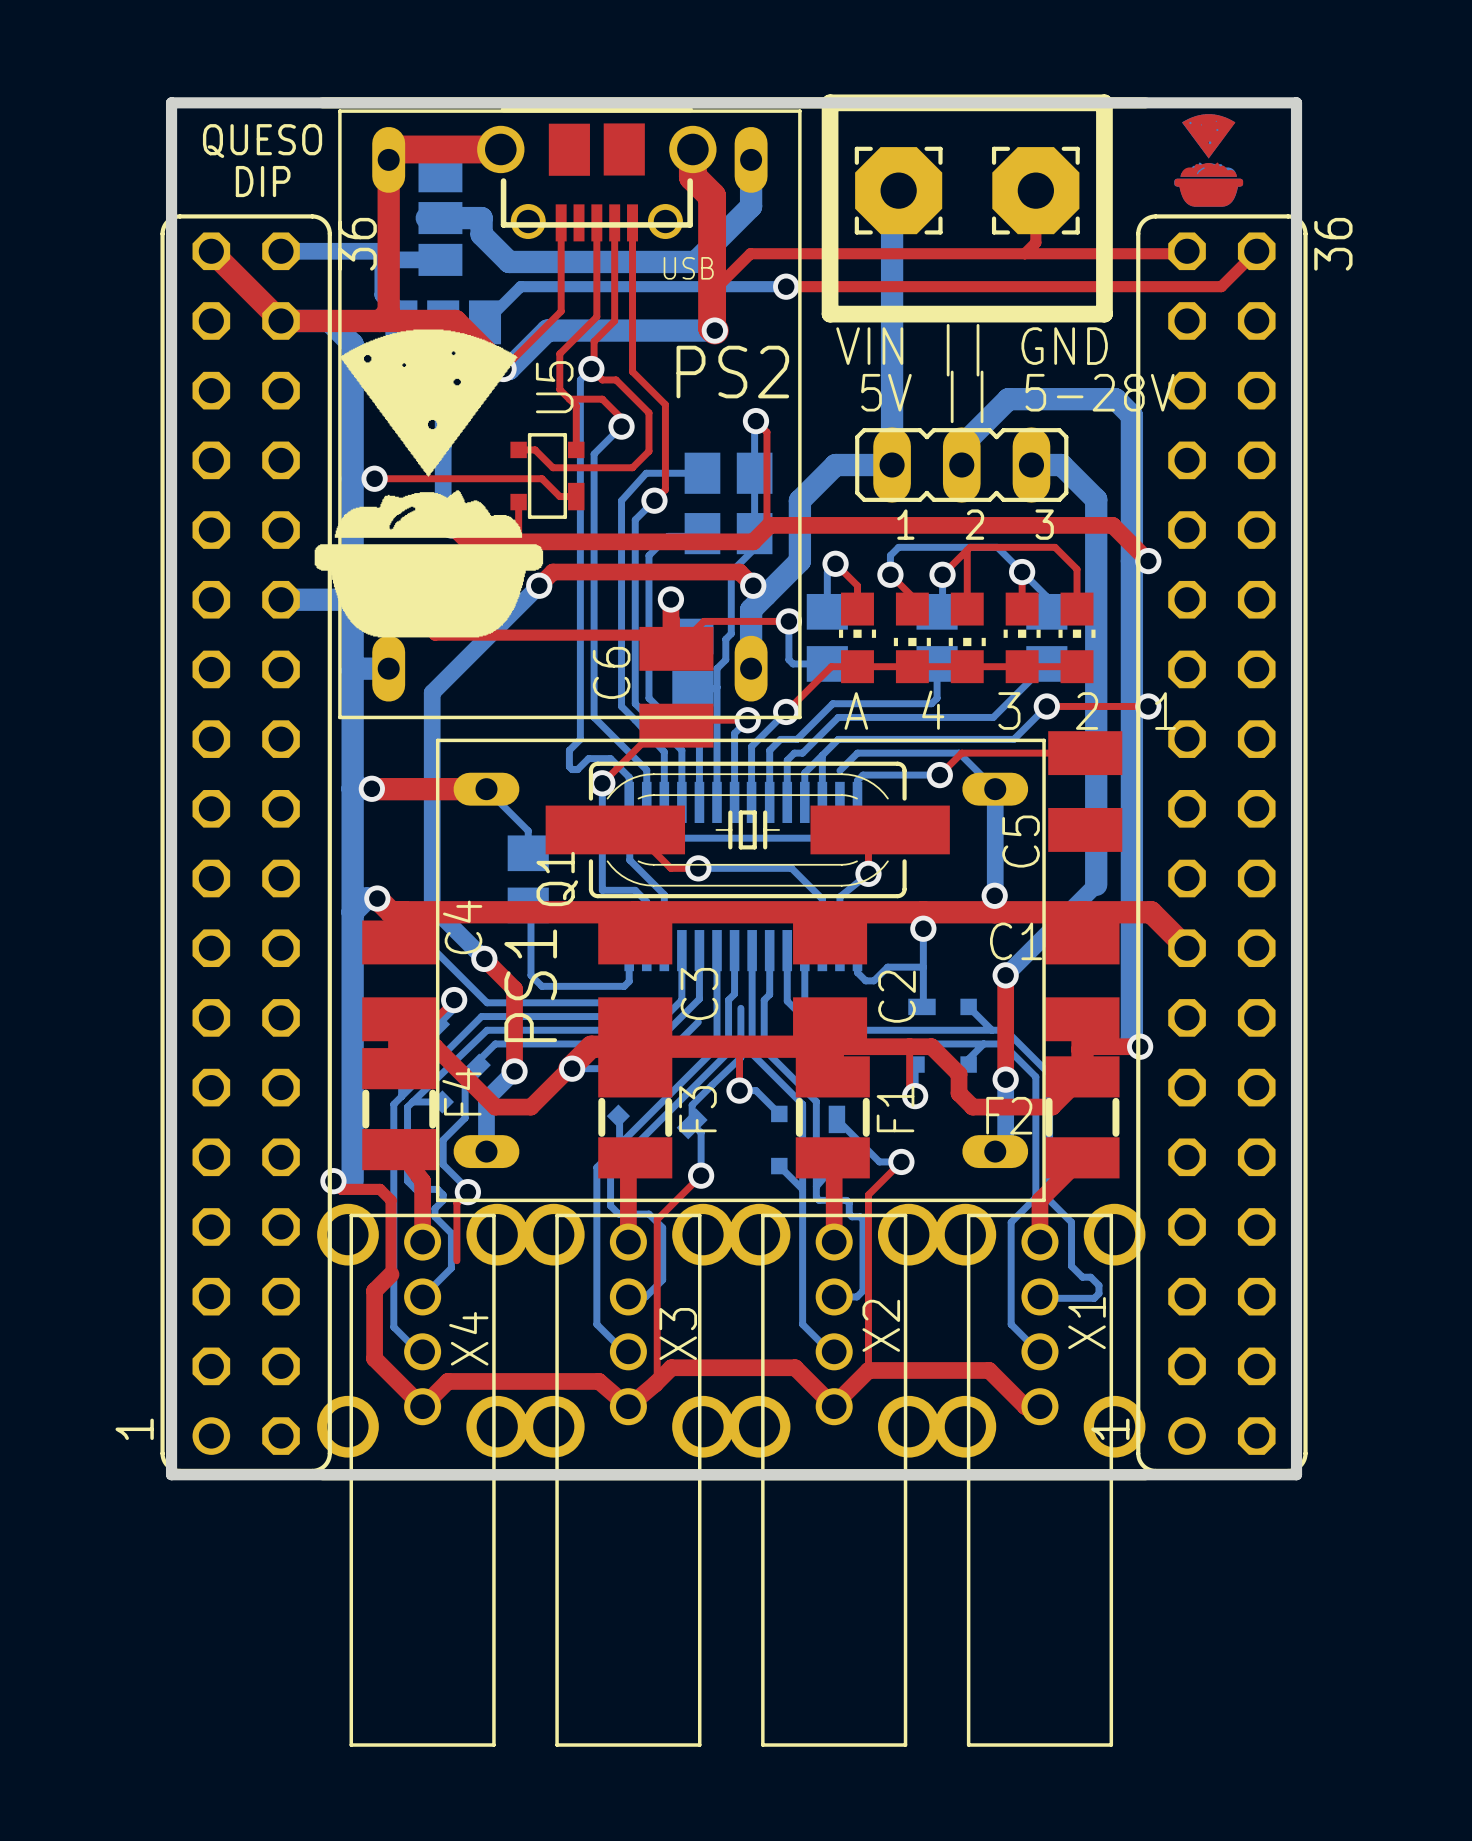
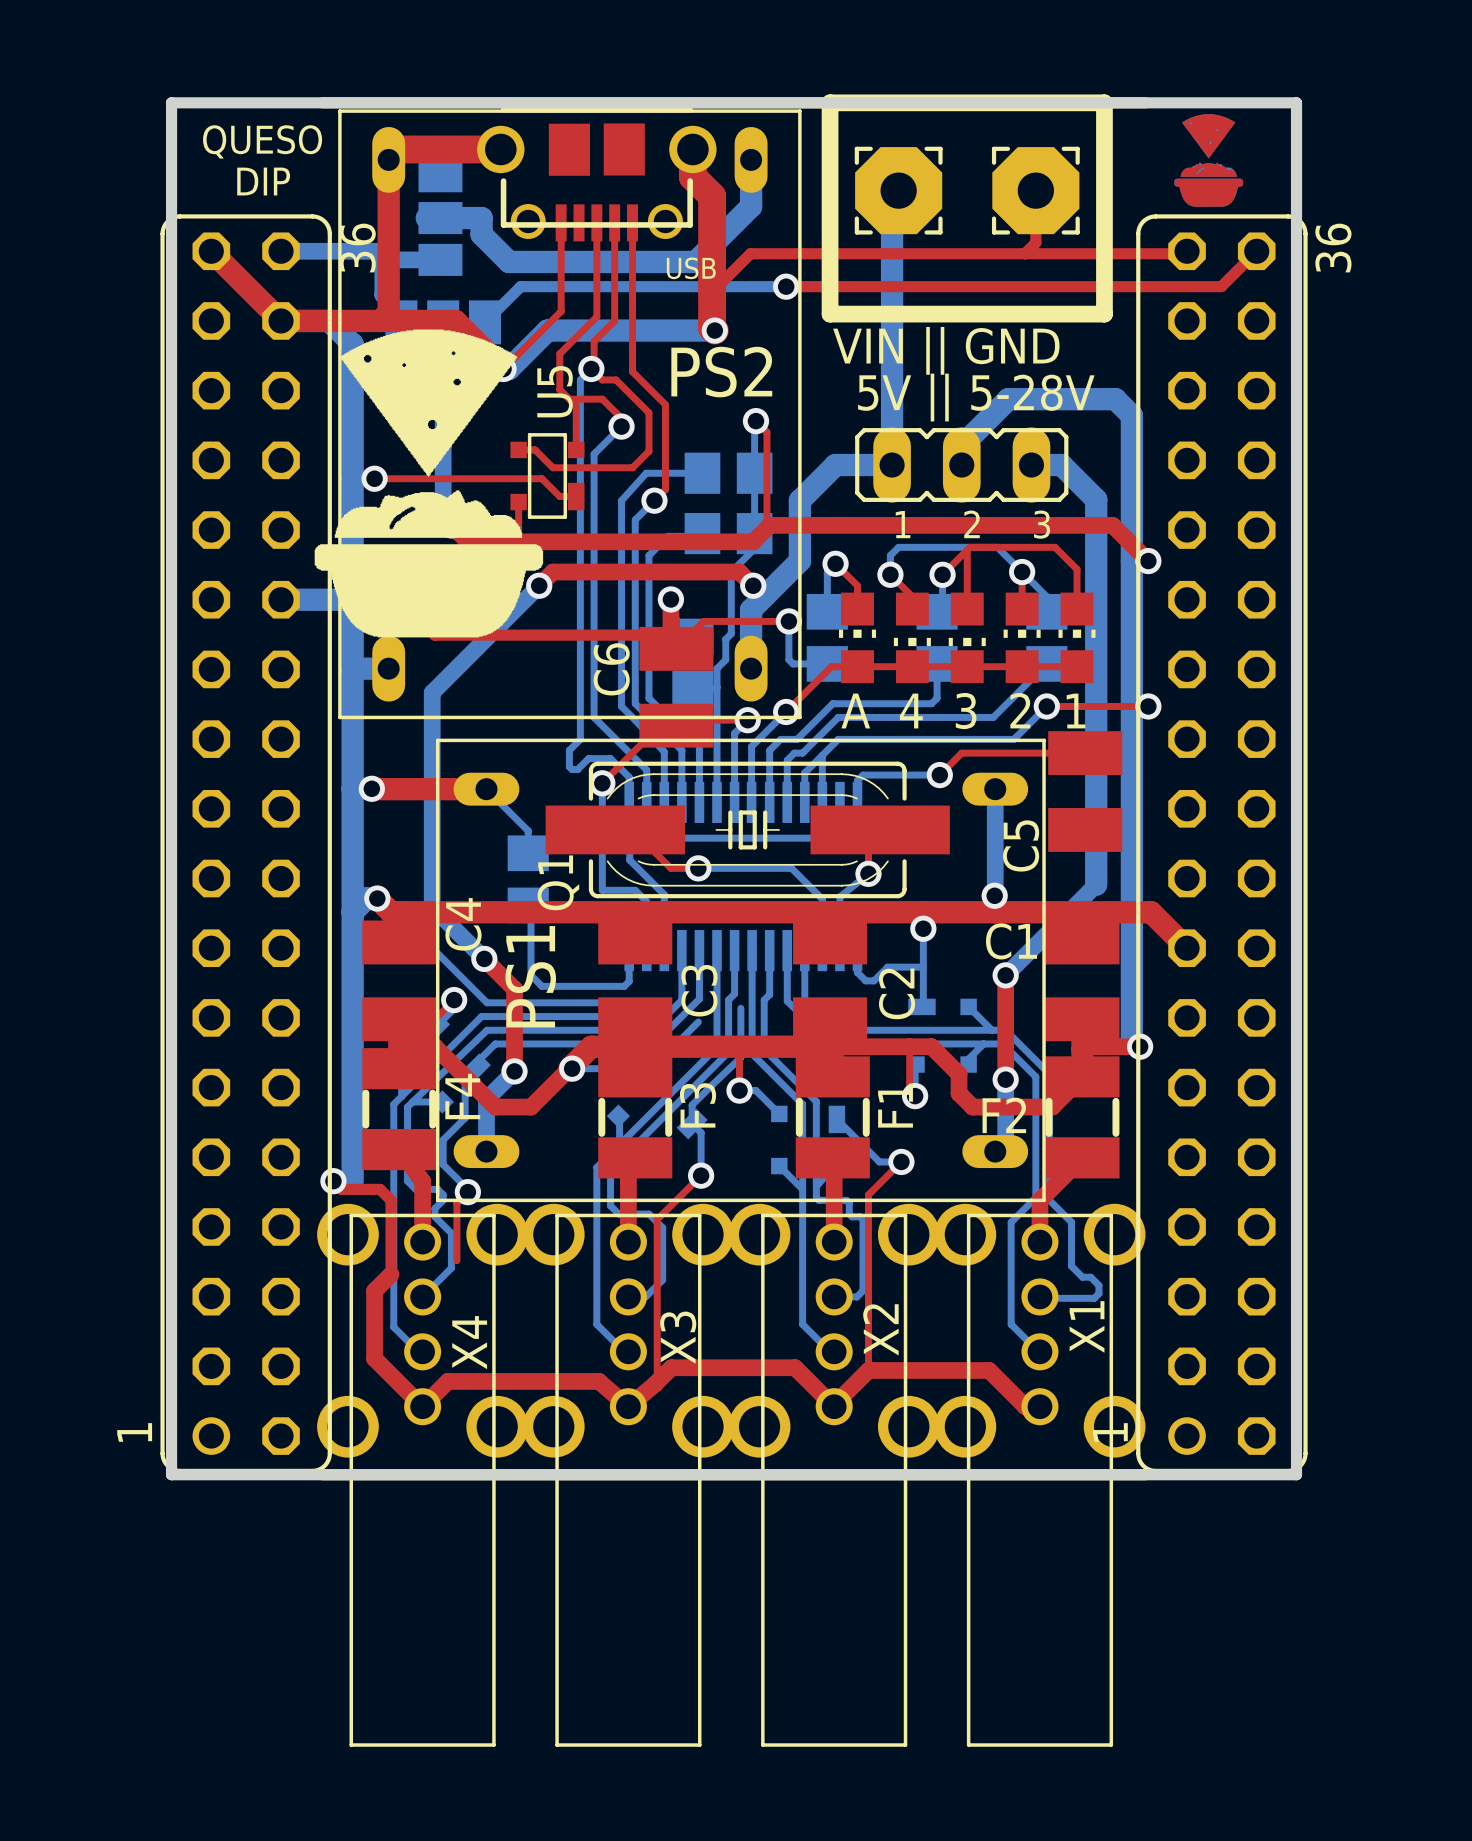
bottom track: (839, 770) (857, 753) (959, 753) (995, 789) -> none

